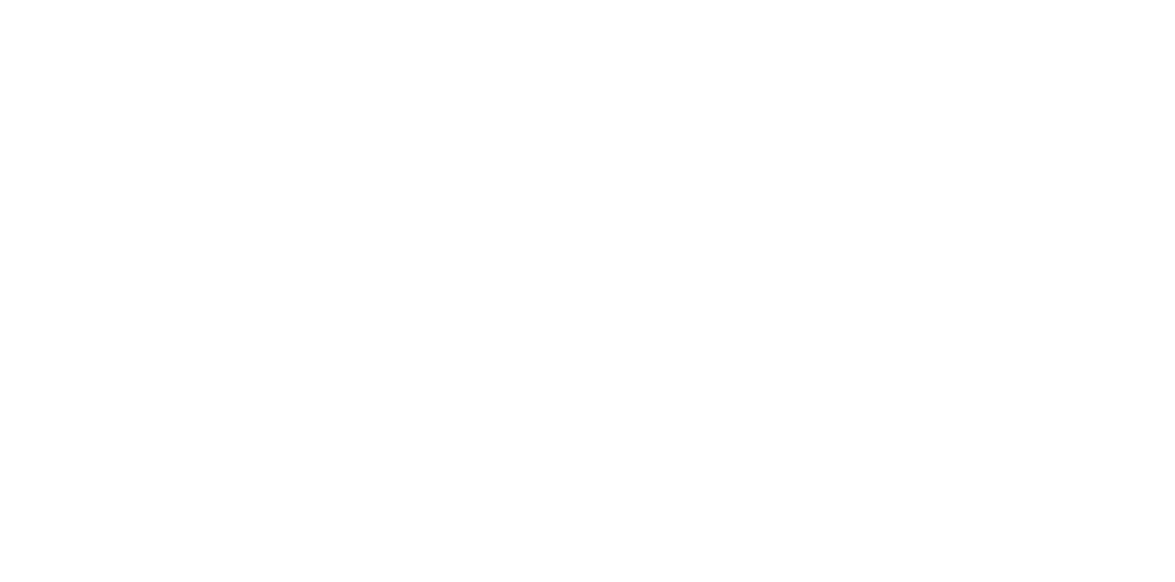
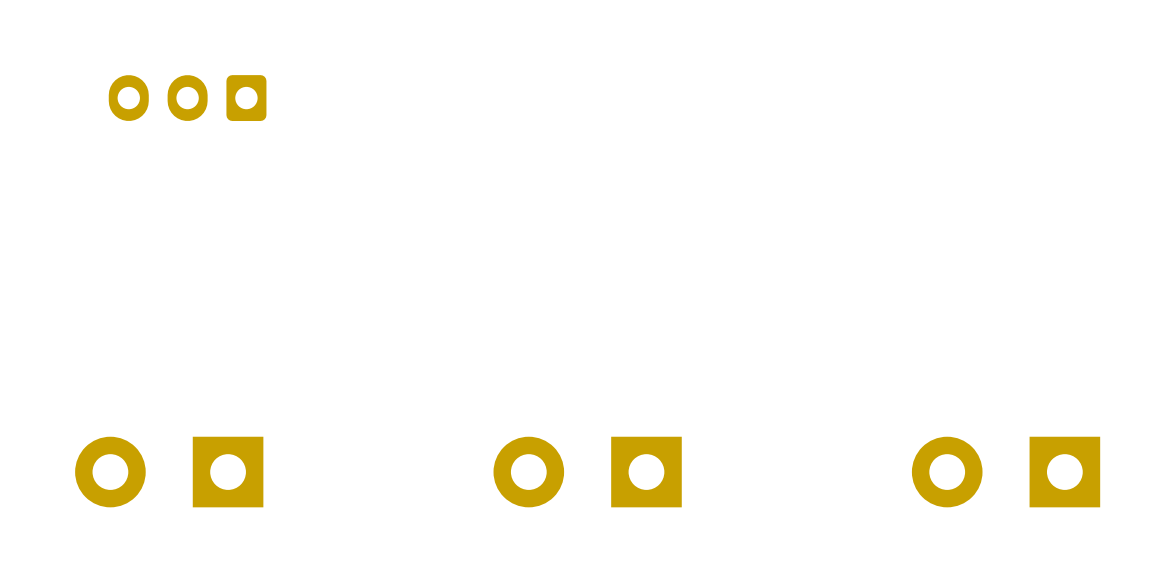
part: none -> (187, 98)
part: none -> (169, 472)
part: none -> (587, 472)
part: none -> (1006, 472)

